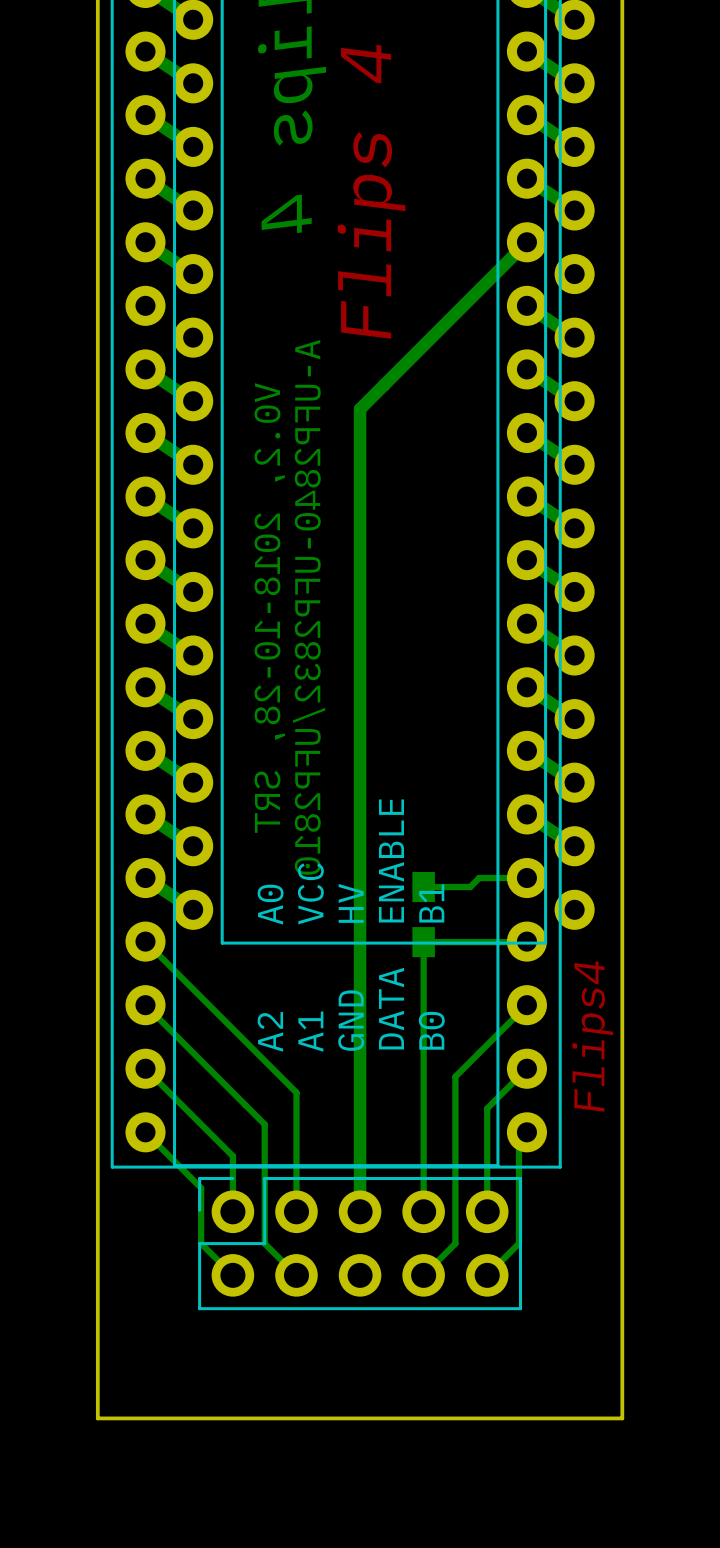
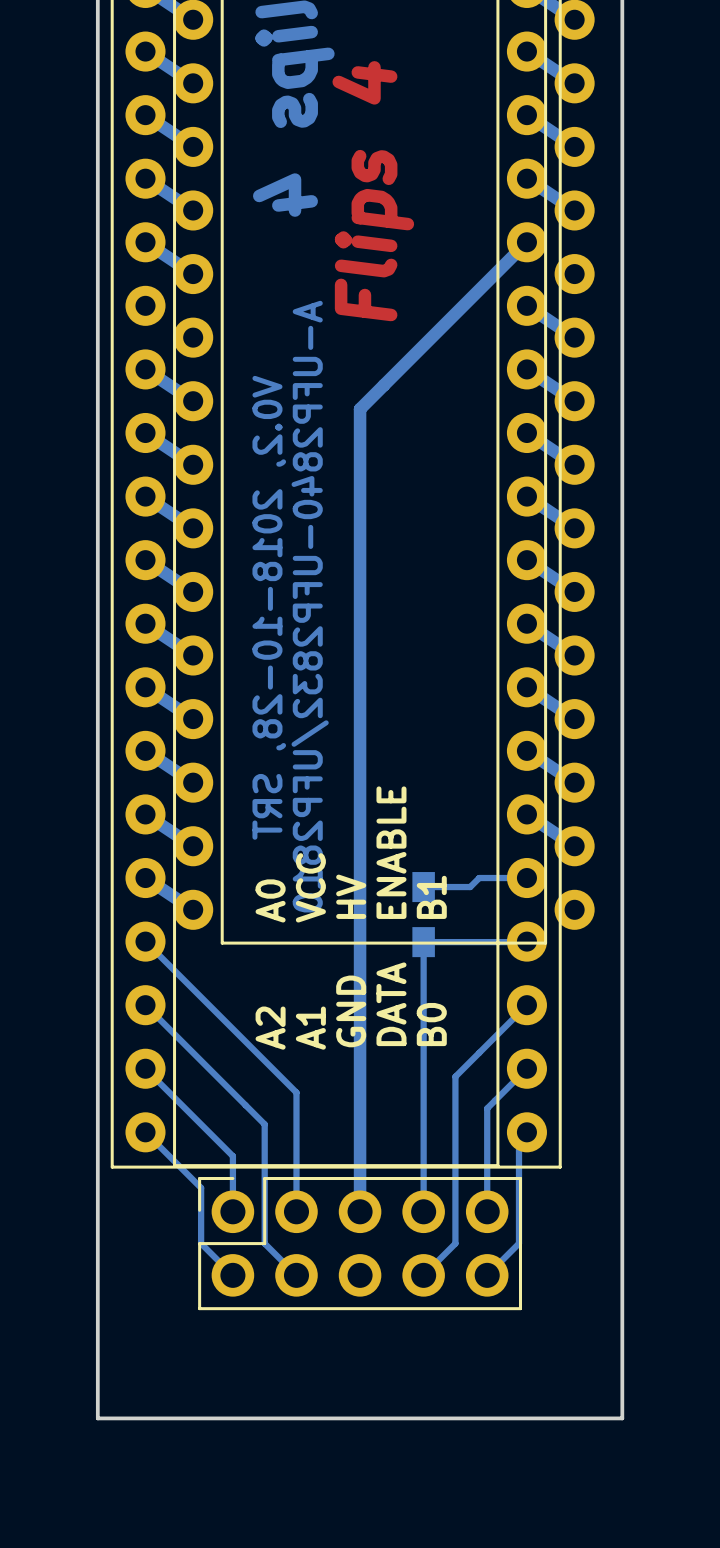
text: Flips4 (592, 1036) -> none

